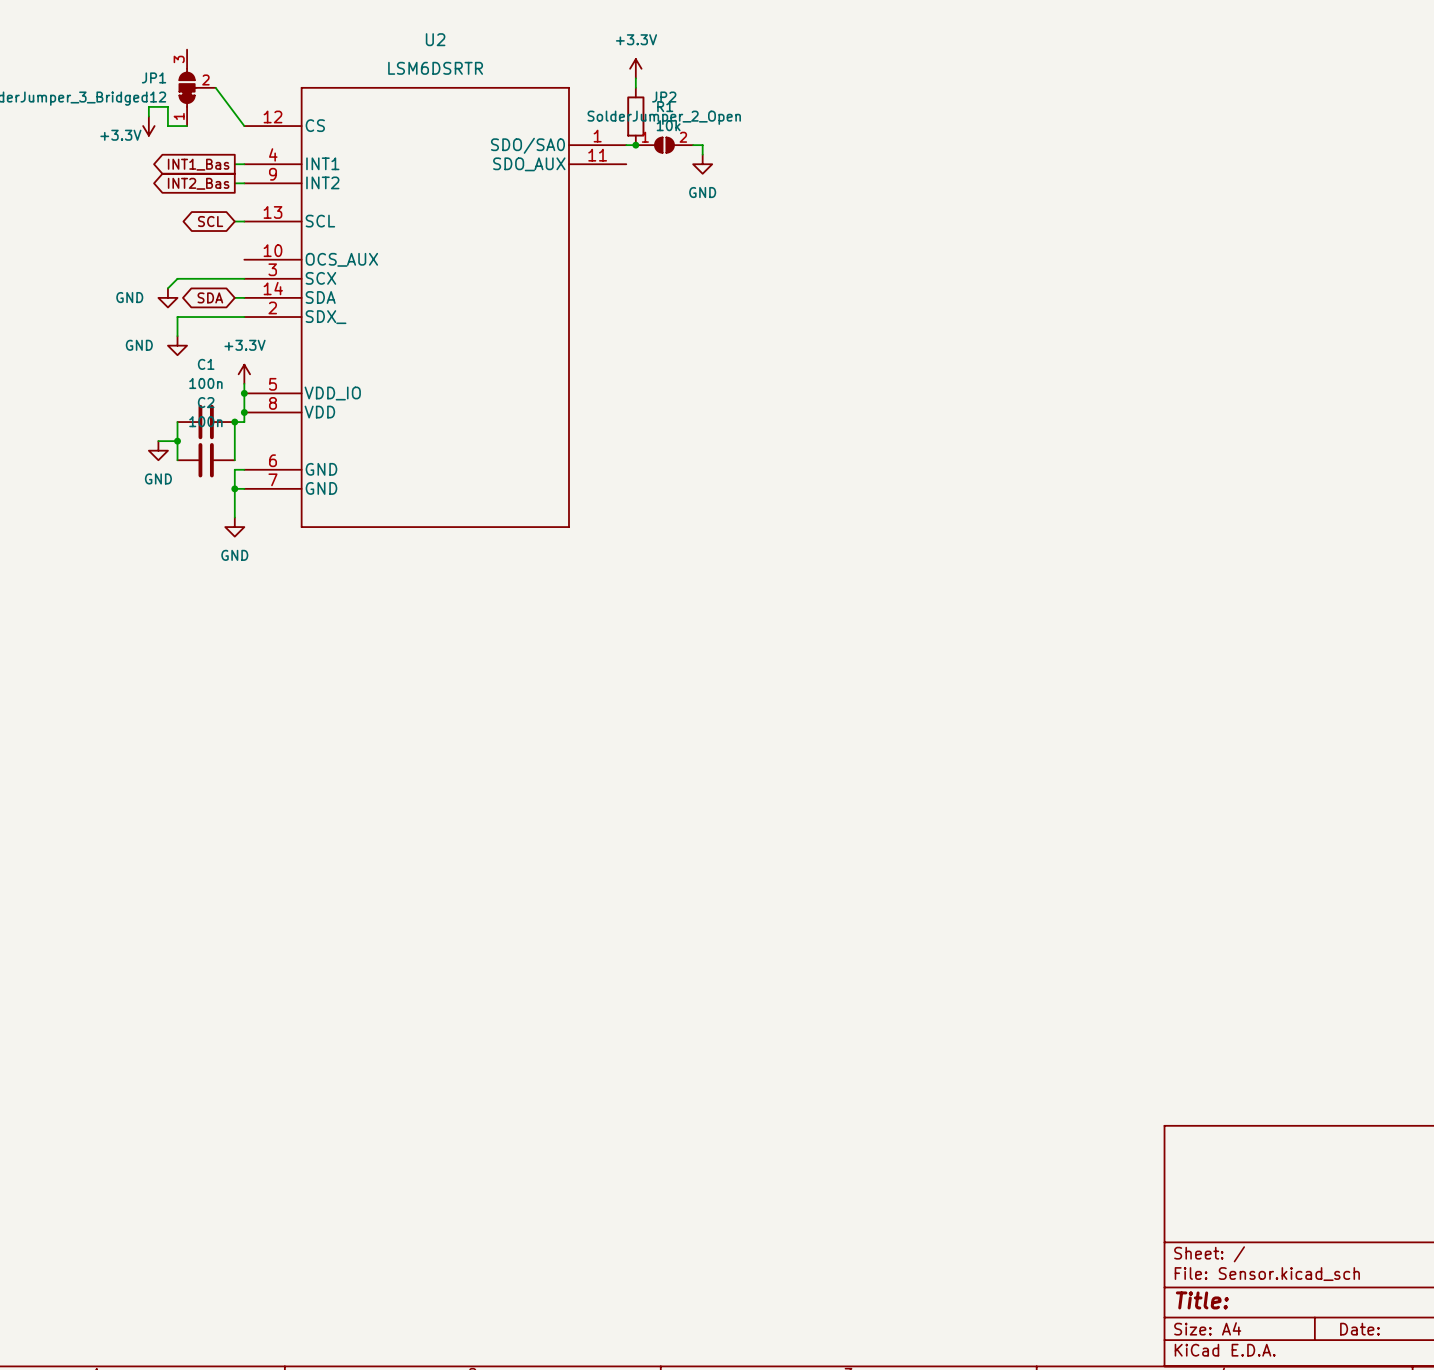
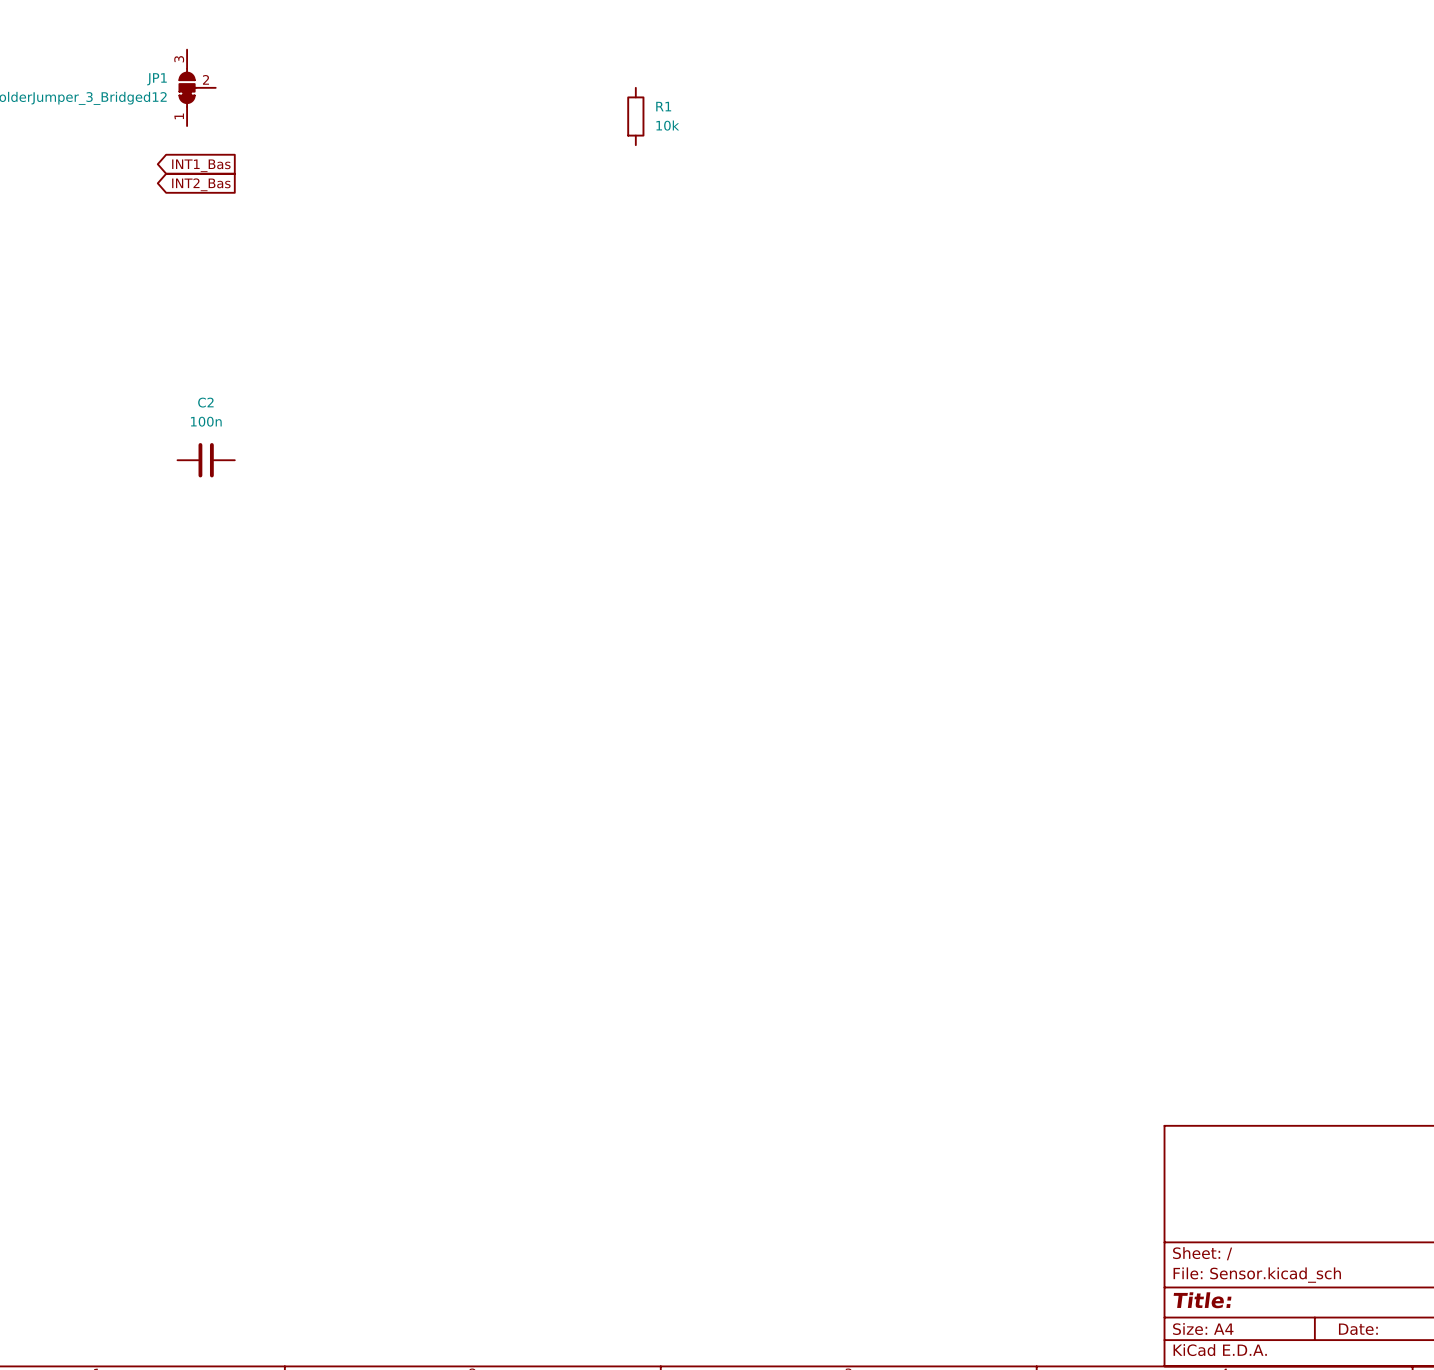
power symbol: +3.3V (635, 68) -> none
wire: (635, 78) (635, 87) -> none
wire: (215, 87) (244, 126) -> none
wire: (148, 116) (148, 106) (167, 106) (167, 126) (187, 126) -> none
power symbol: +3.3V (148, 126) -> none
wire: (626, 145) (635, 145) -> none
junction: (635, 145) -> none
JP2: SolderJumper_2_Open (664, 145) -> none
wire: (693, 145) (702, 145) (702, 154) -> none
wire: (234, 164) (244, 164) -> none
power symbol: GND (702, 164) -> none
wire: (234, 183) (244, 183) -> none
global label: SCL (210, 221) -> none
wire: (234, 221) (244, 221) -> none
wire: (244, 278) (177, 278) (167, 288) -> none
power symbol: GND (167, 297) -> none
global label: SDA (210, 297) -> none
wire: (234, 297) (244, 297) -> none
U2: LSM6DSRTR (435, 307) -> none
wire: (244, 317) (177, 317) (177, 336) -> none
power symbol: GND (177, 345) -> none
power symbol: +3.3V (244, 374) -> none
wire: (244, 383) (244, 422) (234, 422) (234, 460) -> none
junction: (244, 393) -> none
junction: (244, 412) -> none
wire: (177, 422) (177, 460) -> none
C1: 100n (206, 422) -> none
junction: (234, 422) -> none
wire: (158, 441) (177, 441) -> none
junction: (177, 441) -> none
power symbol: GND (158, 450) -> none
wire: (244, 469) (234, 469) (234, 517) -> none
wire: (234, 488) (244, 488) -> none
junction: (234, 488) -> none
power symbol: GND (234, 527) -> none

